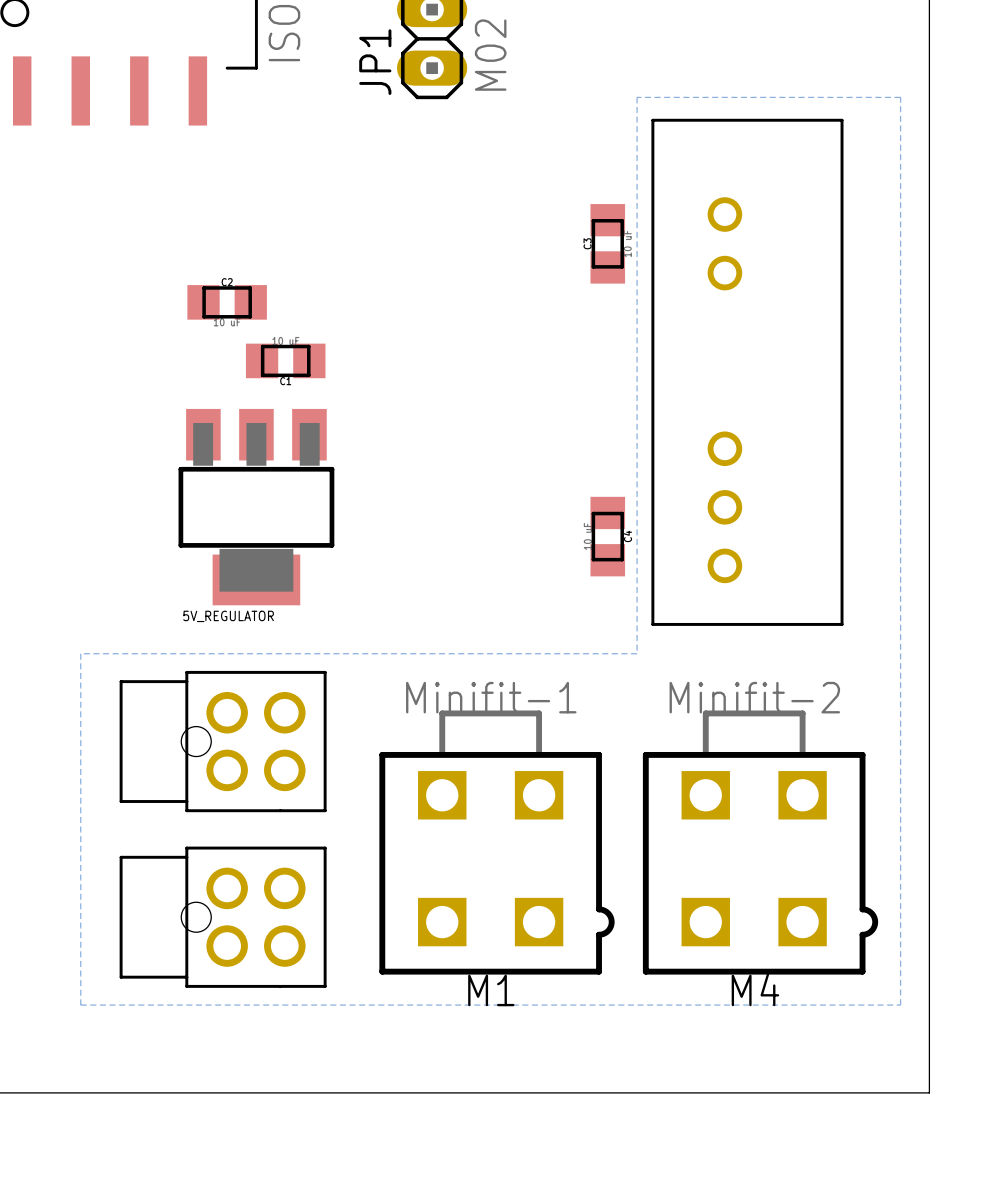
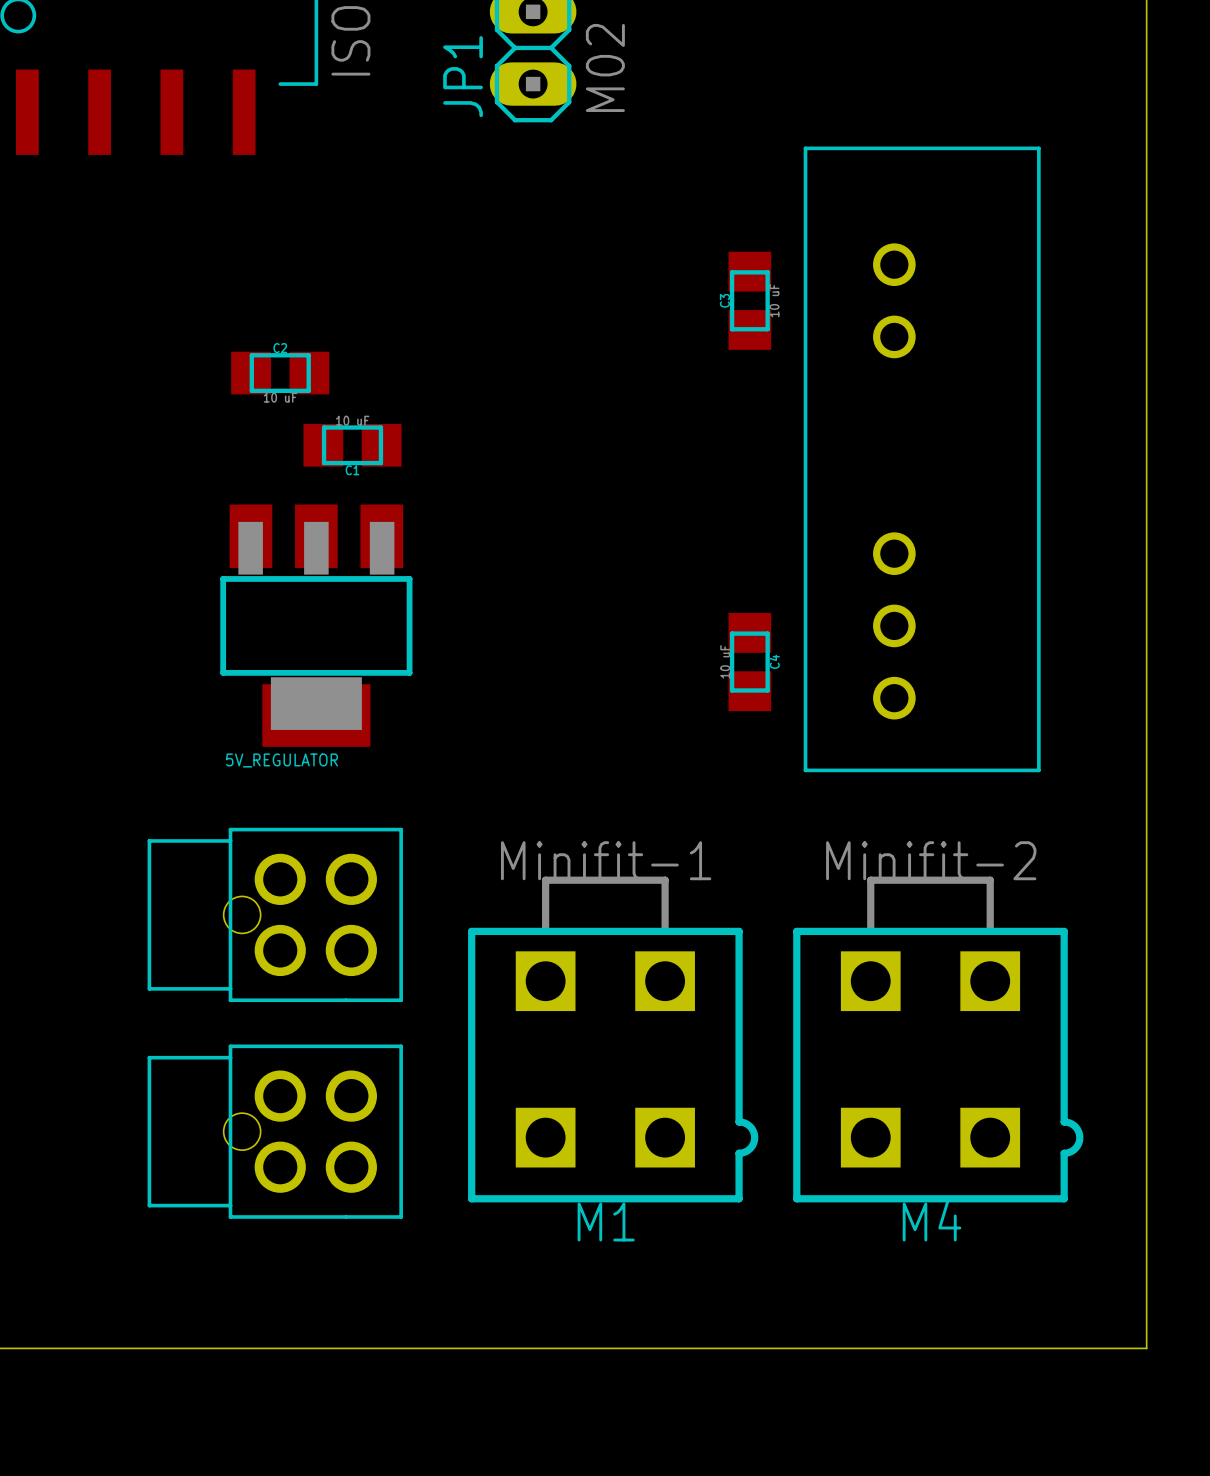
bottom zone outline: (637, 97) (900, 97) (900, 1005) (80, 1005) (80, 653) (637, 653) (637, 97) -> none

